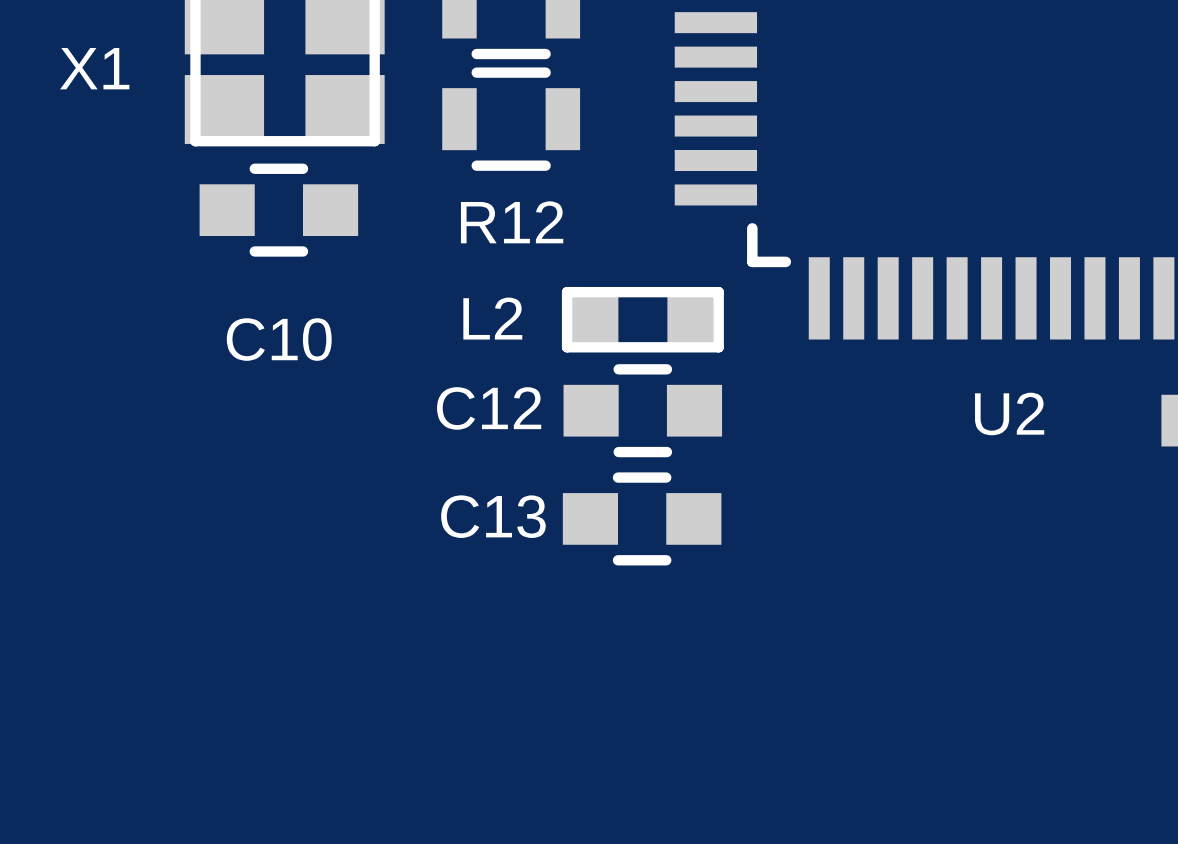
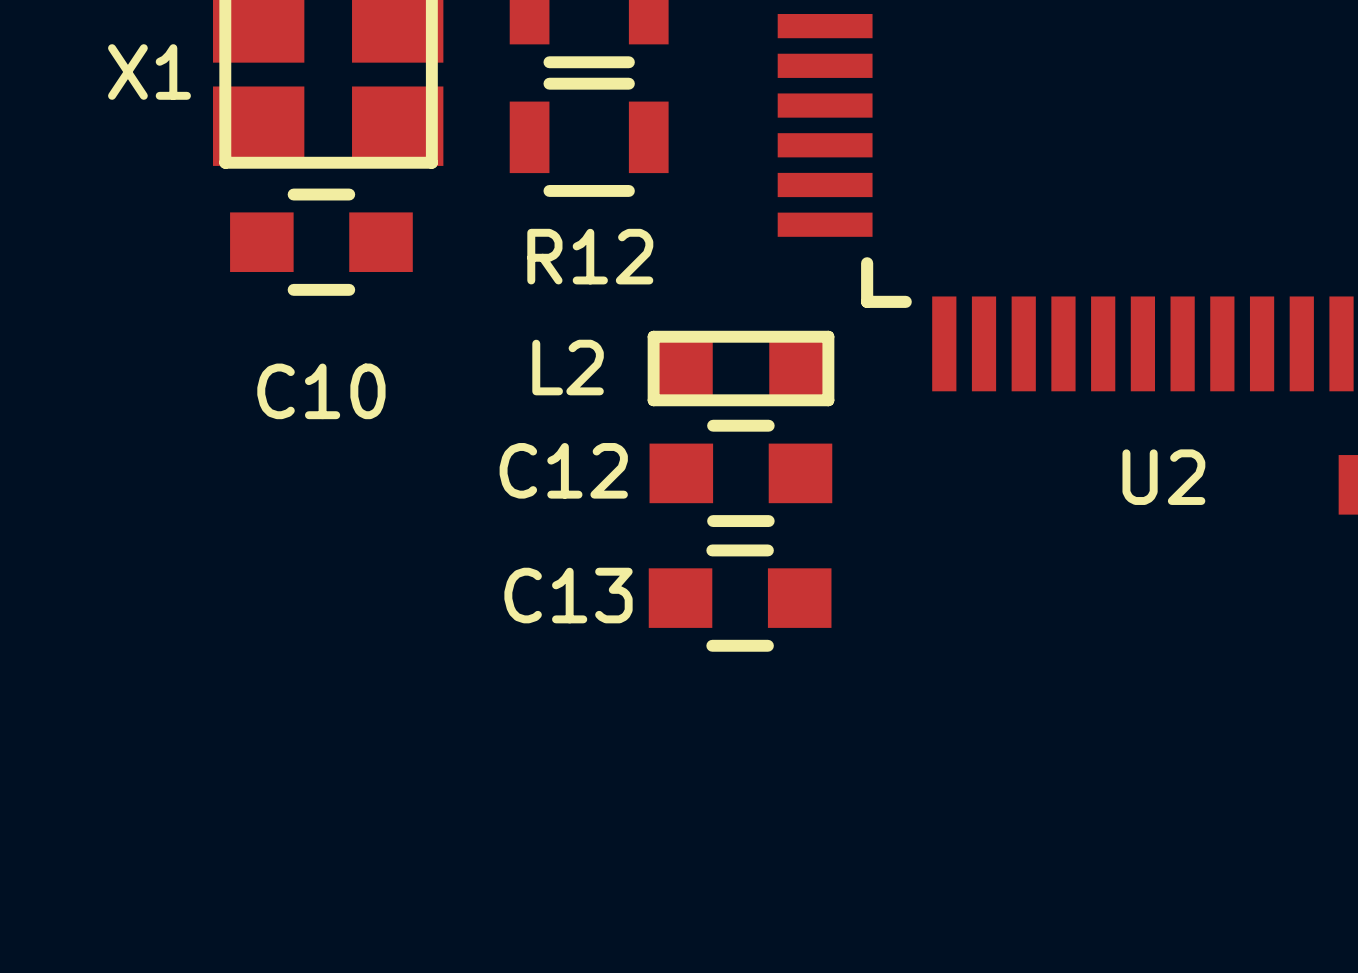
X1 name position: X1 (94, 68) -> X1 (149, 71)

